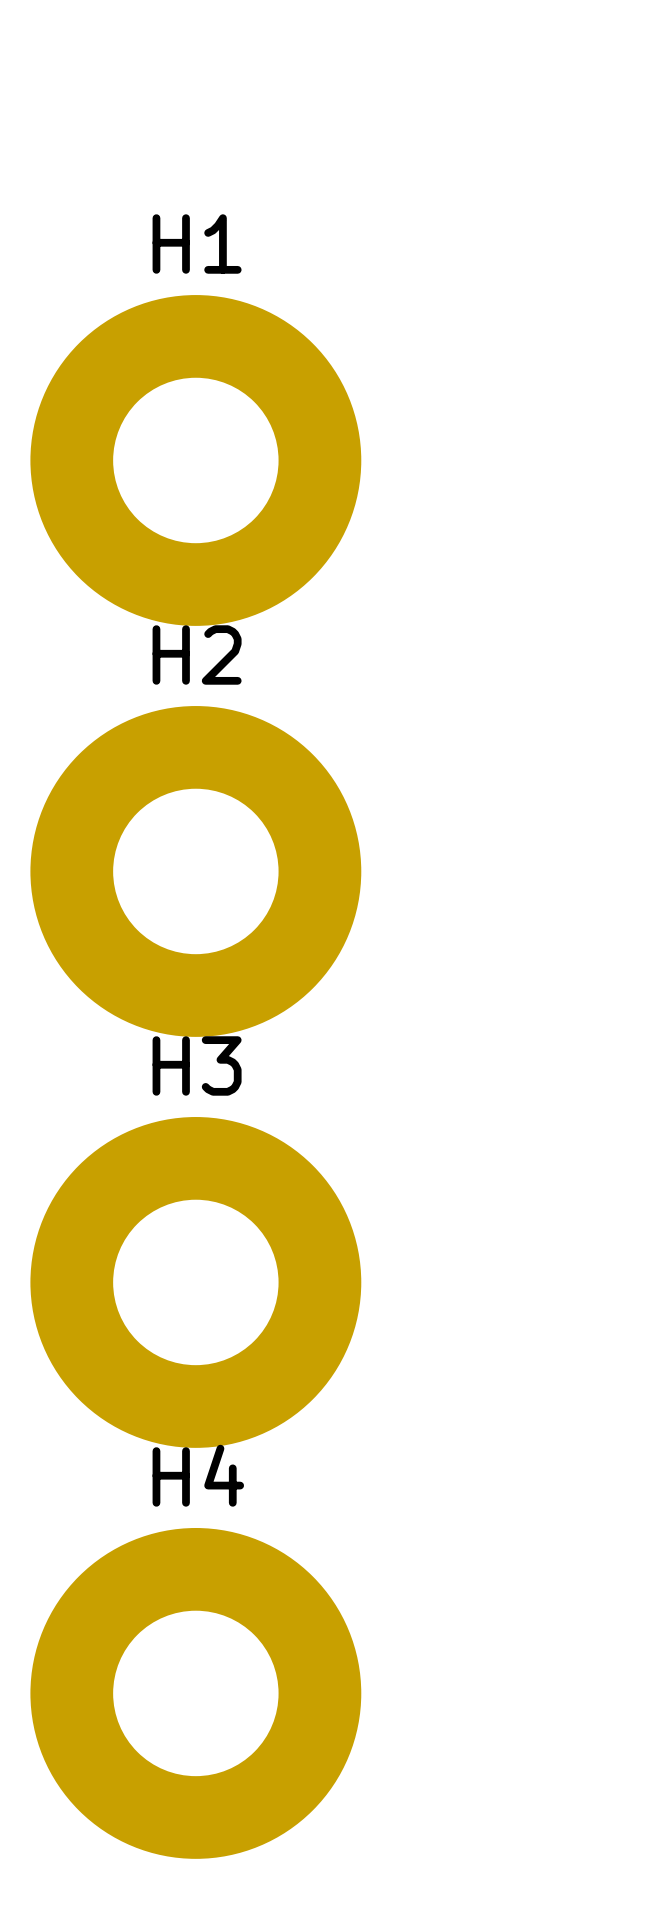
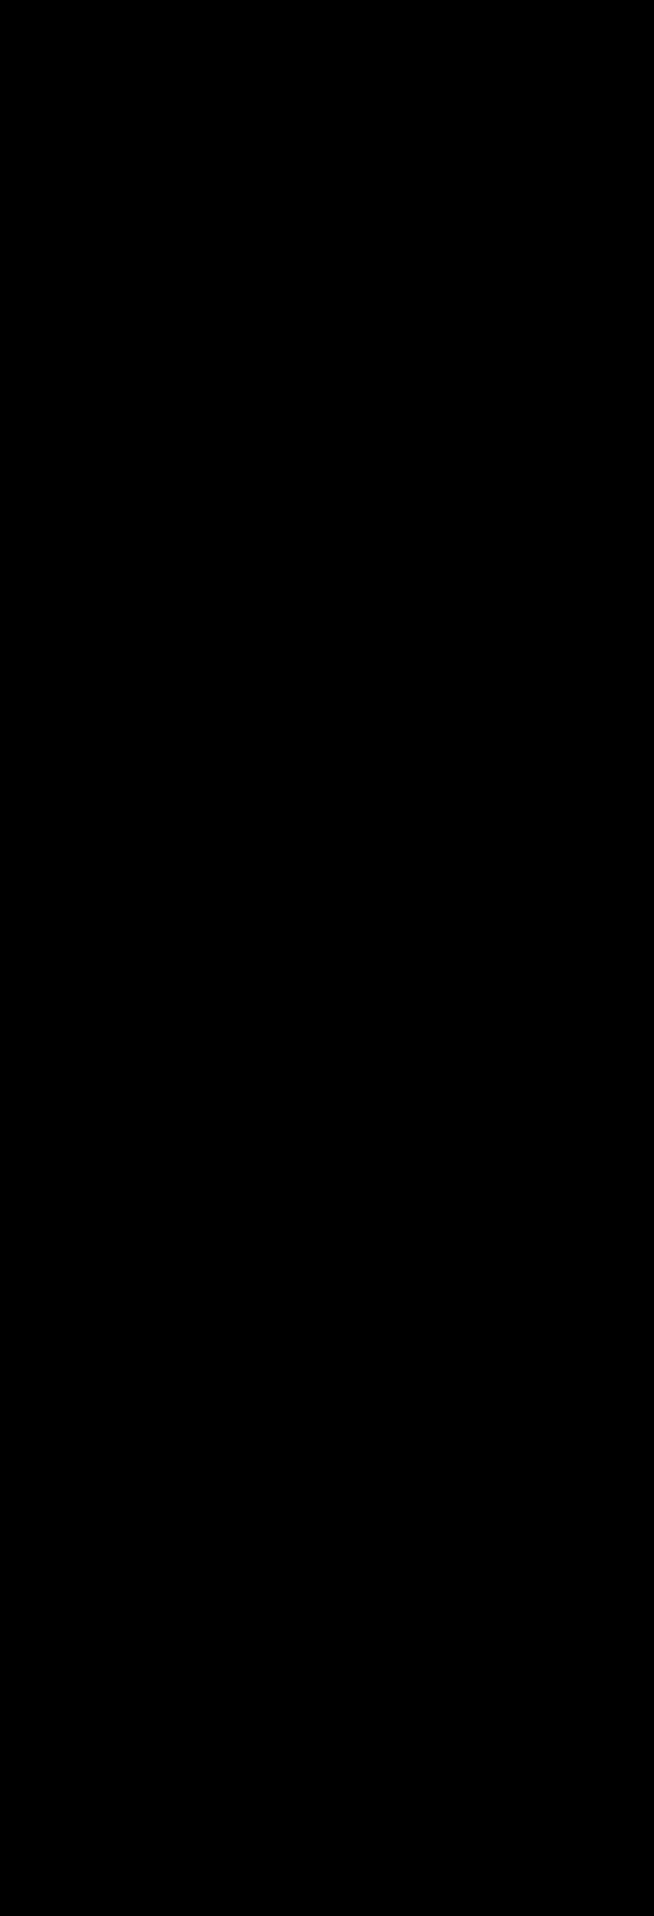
H1: (195, 460) -> none
H2: (195, 871) -> none
H3: (195, 1282) -> none
H4: (195, 1693) -> none

